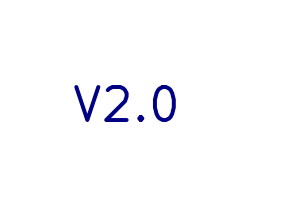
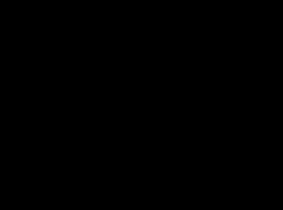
text: V2.0 (125, 103) -> none

